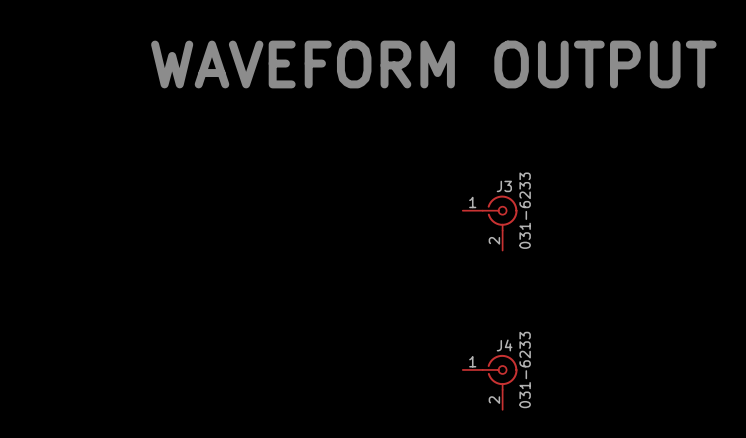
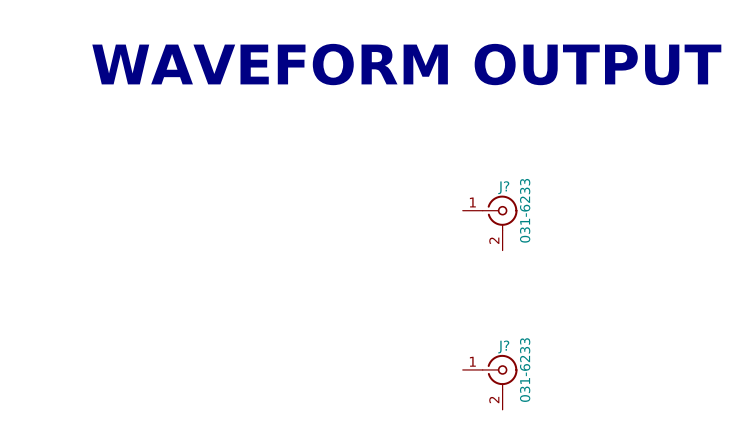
J3 name: J3 (504, 186) -> J? (503, 187)
J4 name: J4 (504, 345) -> J? (503, 346)

